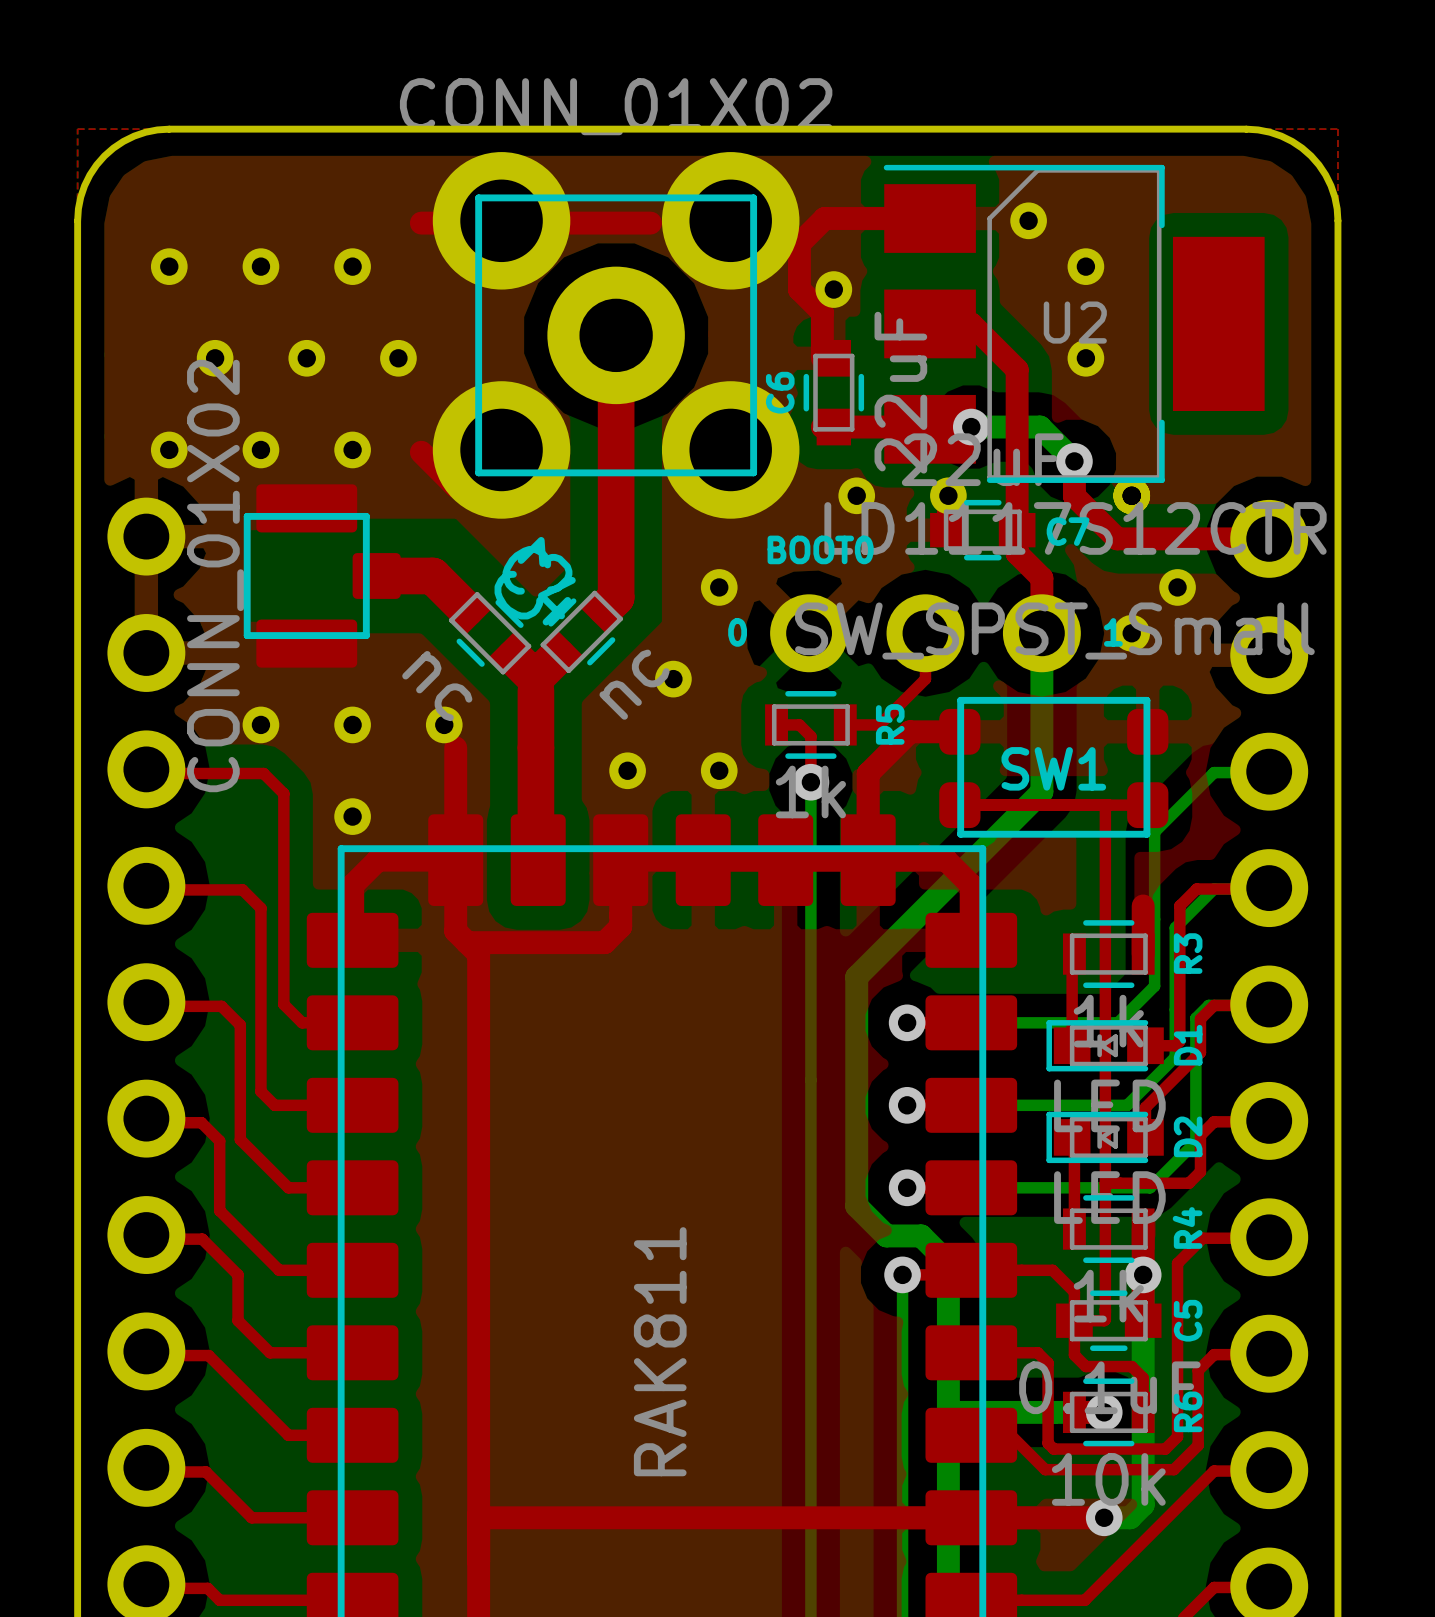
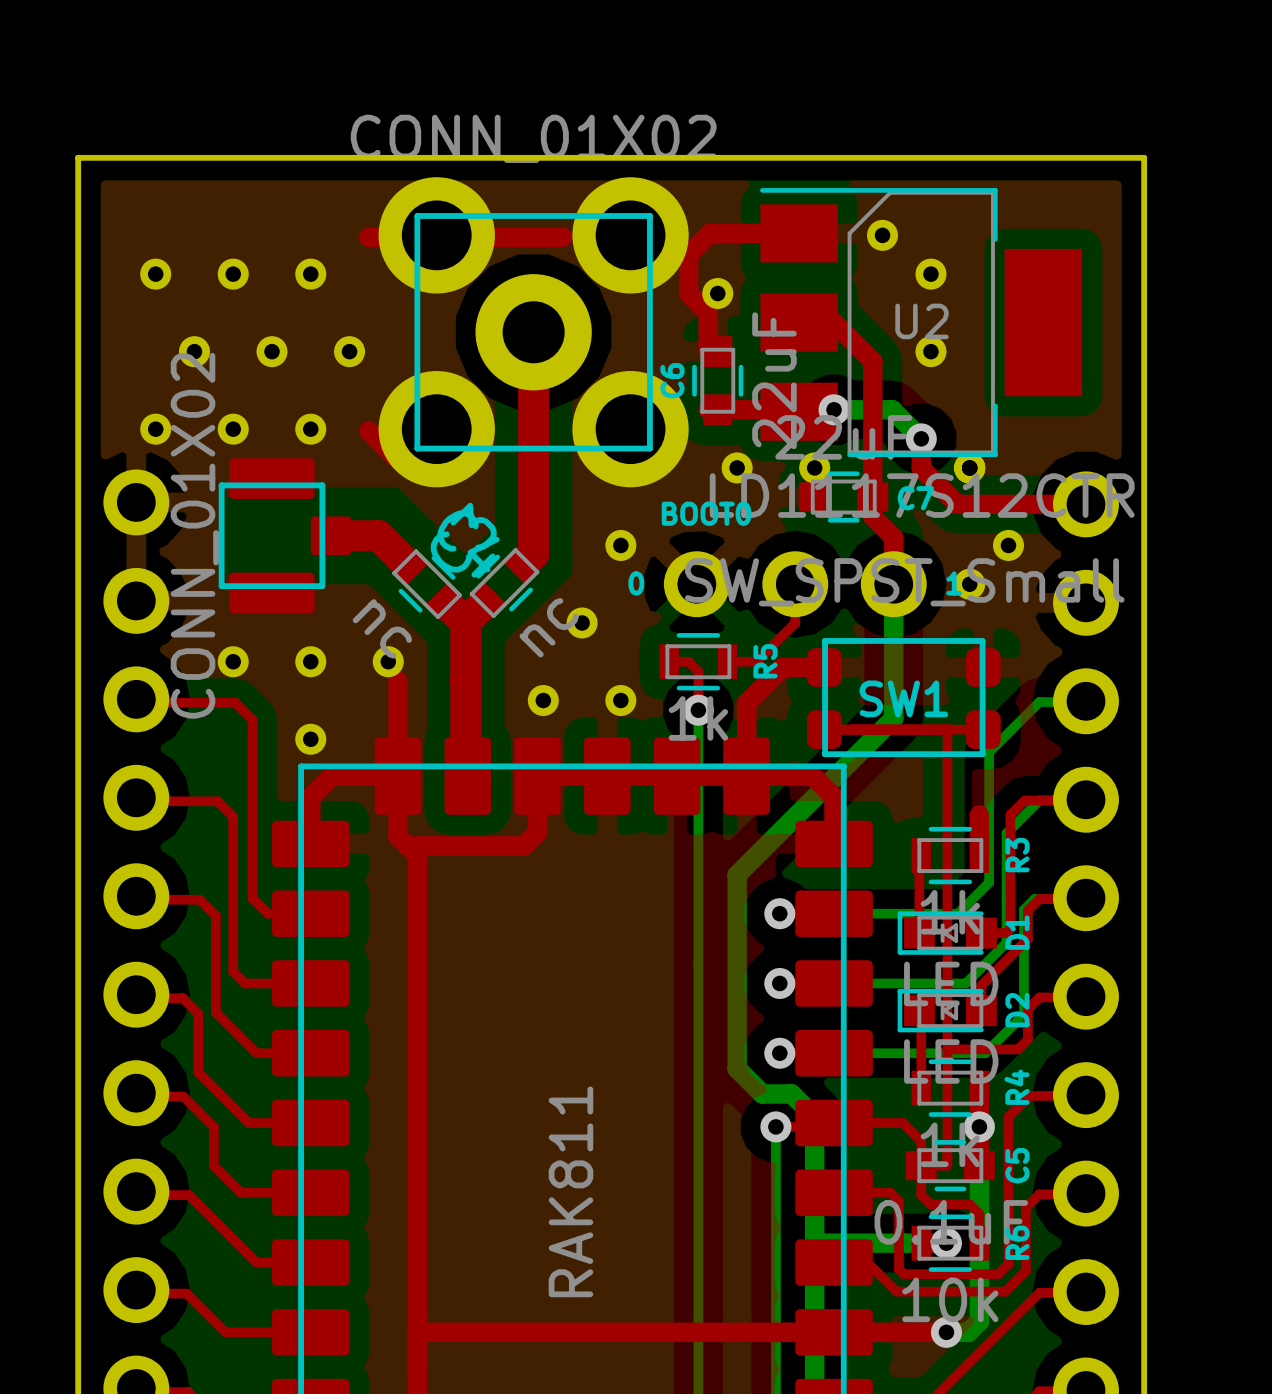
board edge: (169, 129) (145, 132) (134, 136) (113, 148) (104, 155) (96, 165) (84, 185) (80, 197) (77, 220) -> (155, 157) (78, 157) (78, 235)
board edge: (1246, 129) (1270, 132) (1281, 136) (1302, 148) (1311, 155) (1325, 174) (1330, 185) (1334, 197) (1337, 220) -> (1066, 157) (1144, 157) (1144, 235)

